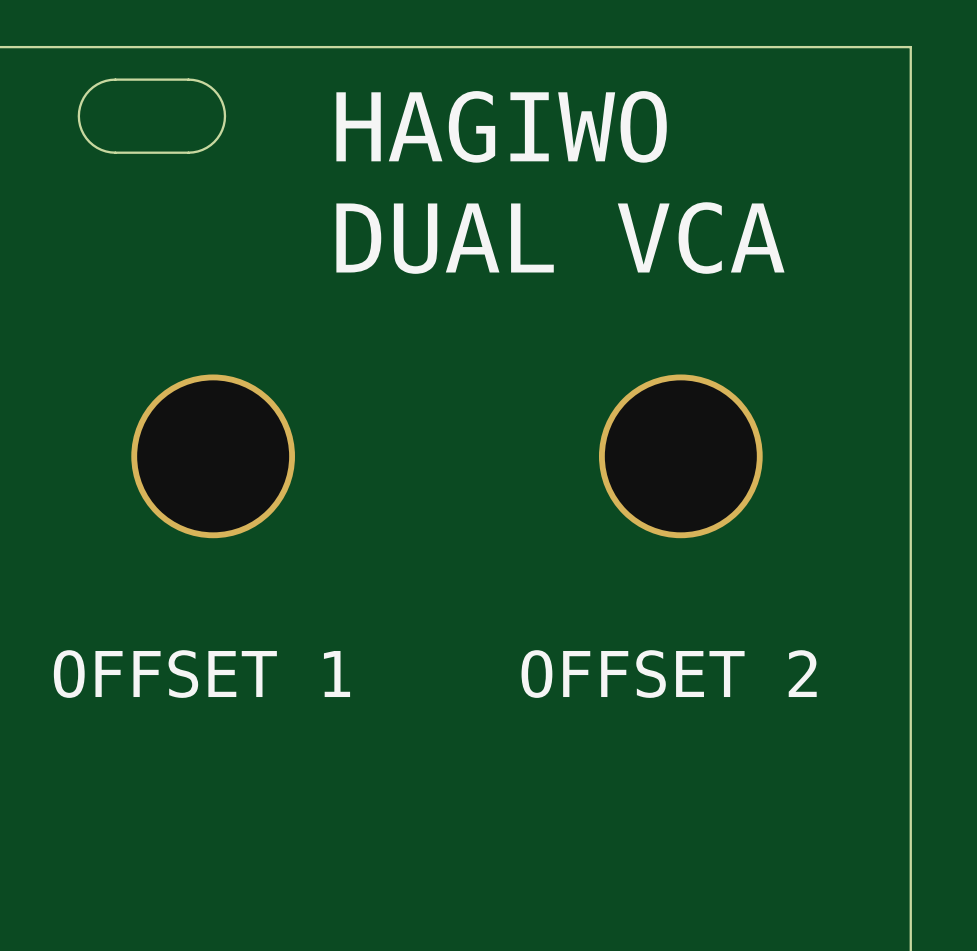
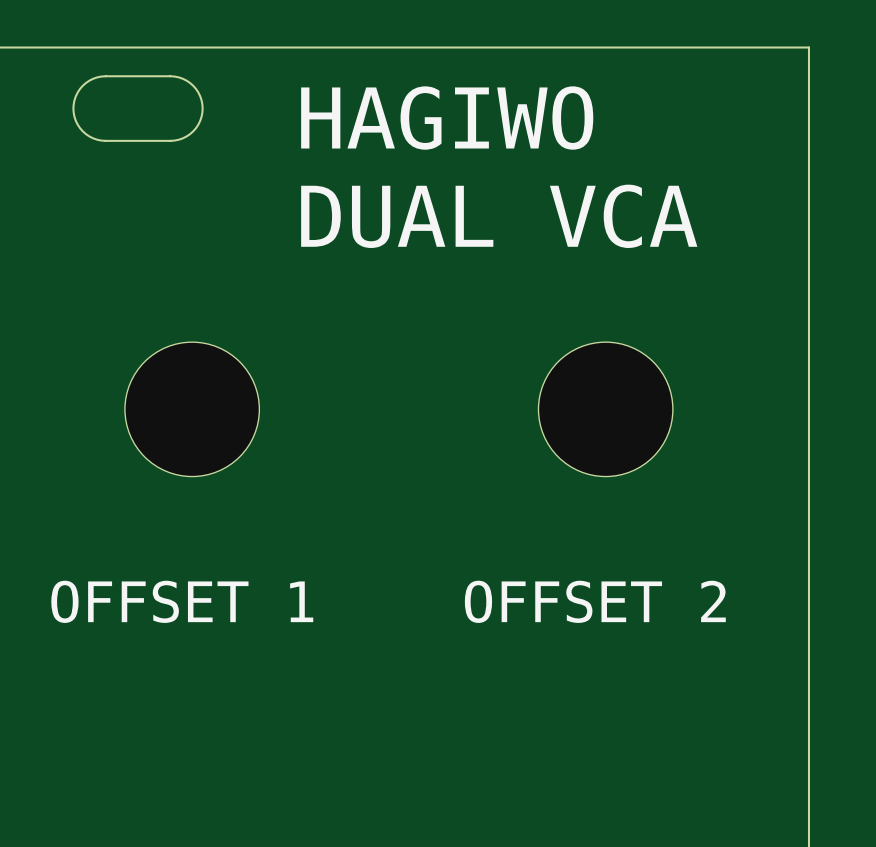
part footprint: [131, 374, 295, 539] -> [124, 342, 260, 477]
part footprint: [598, 374, 763, 539] -> [538, 342, 673, 477]

